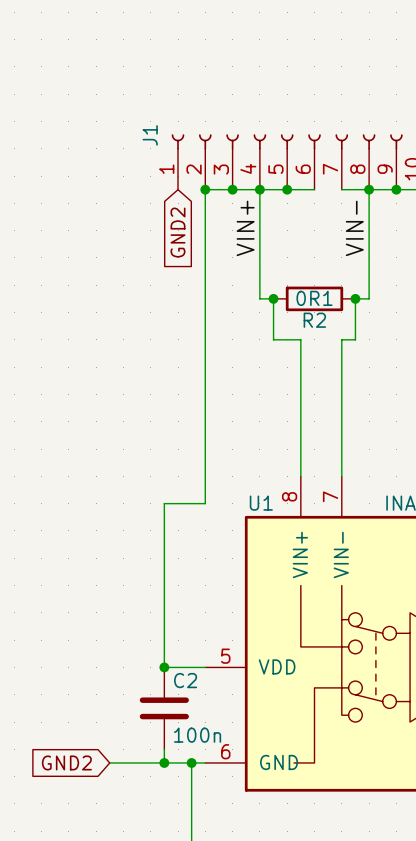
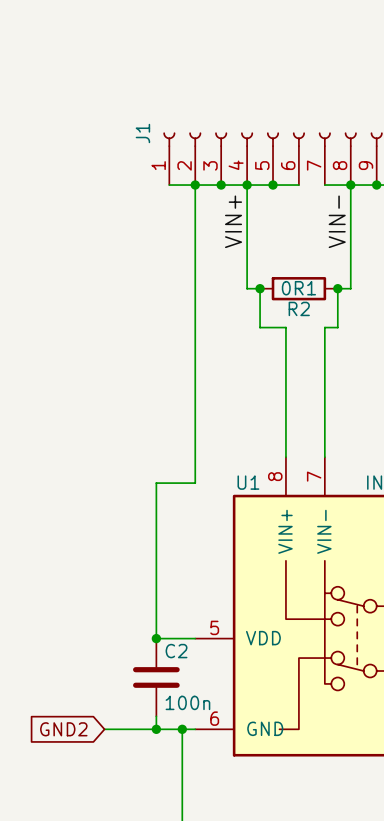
wire: none -> (169, 185) (195, 185)
global label: GND2 (178, 232) -> none

